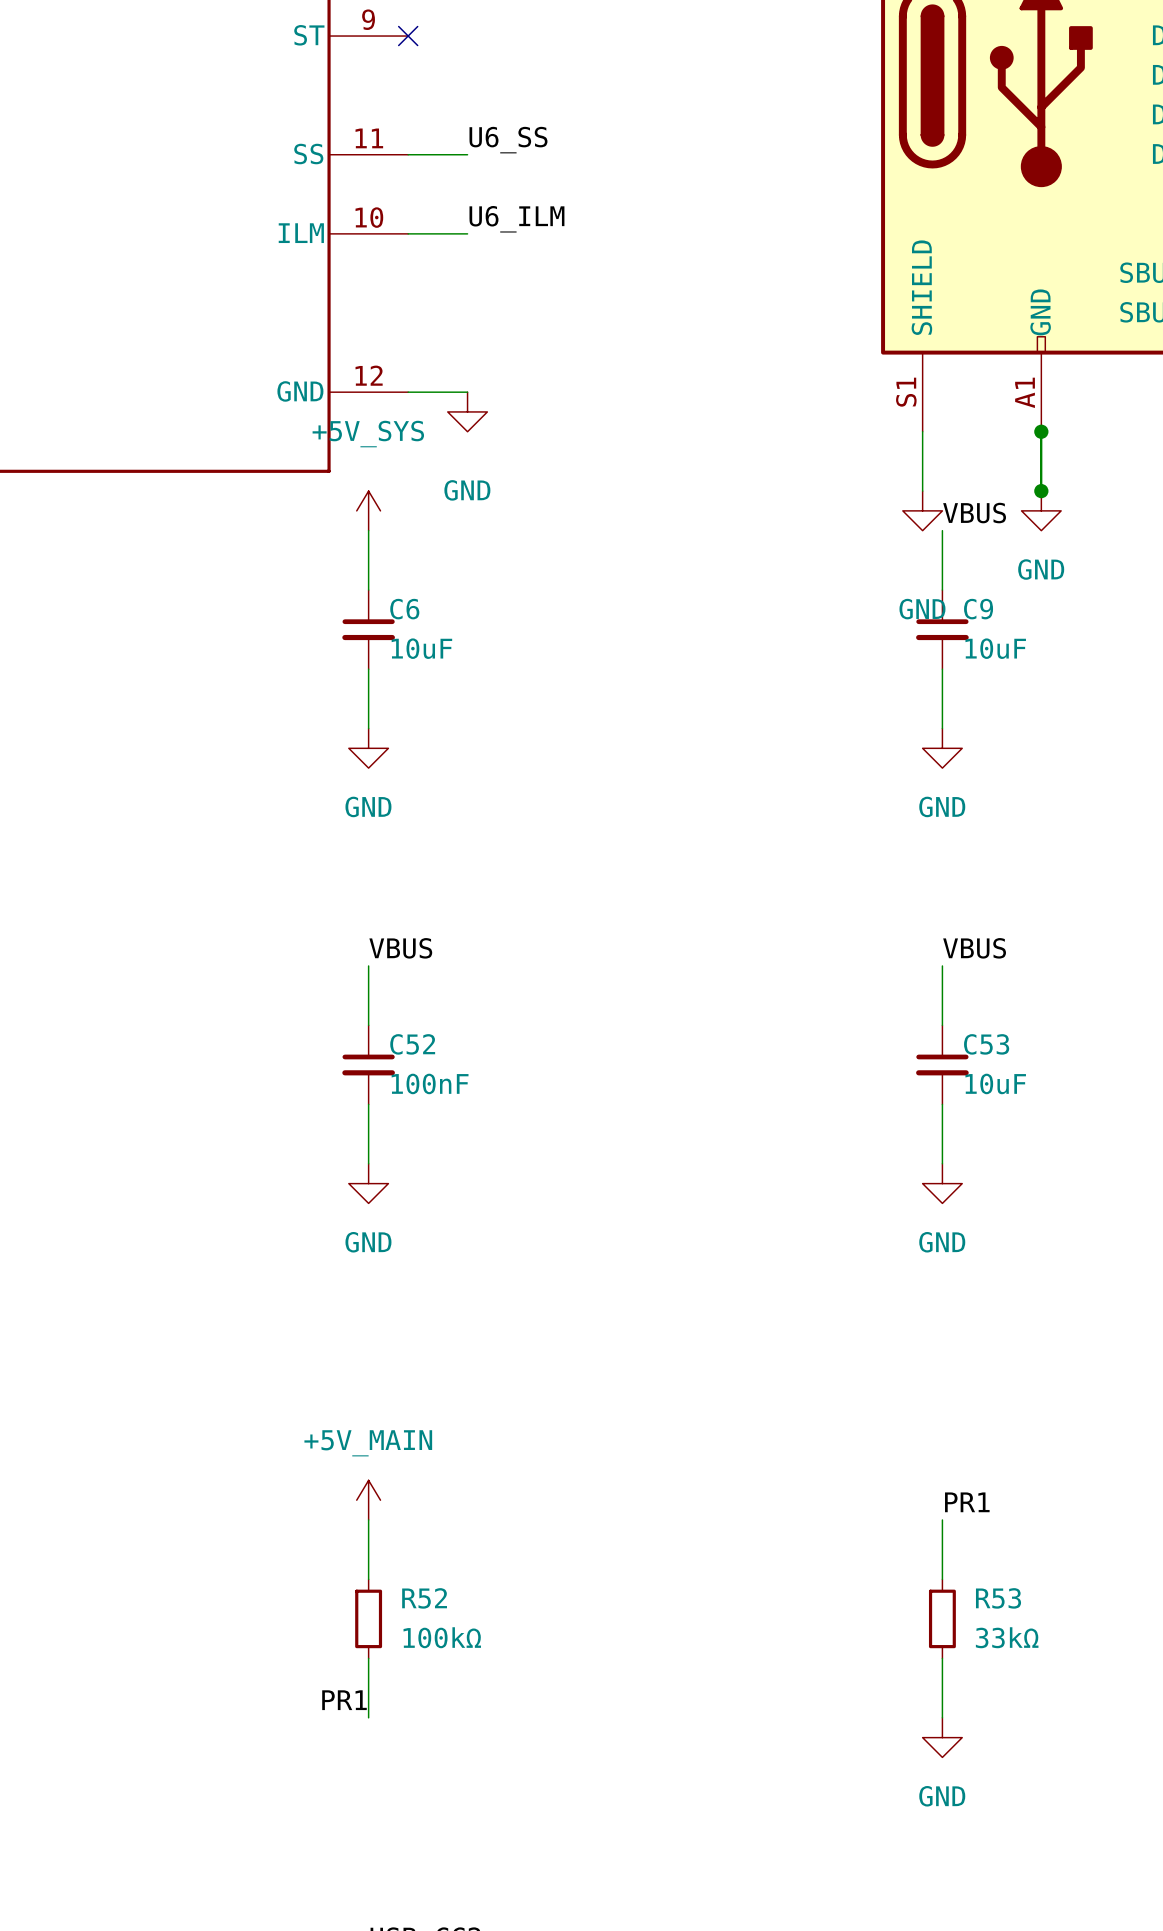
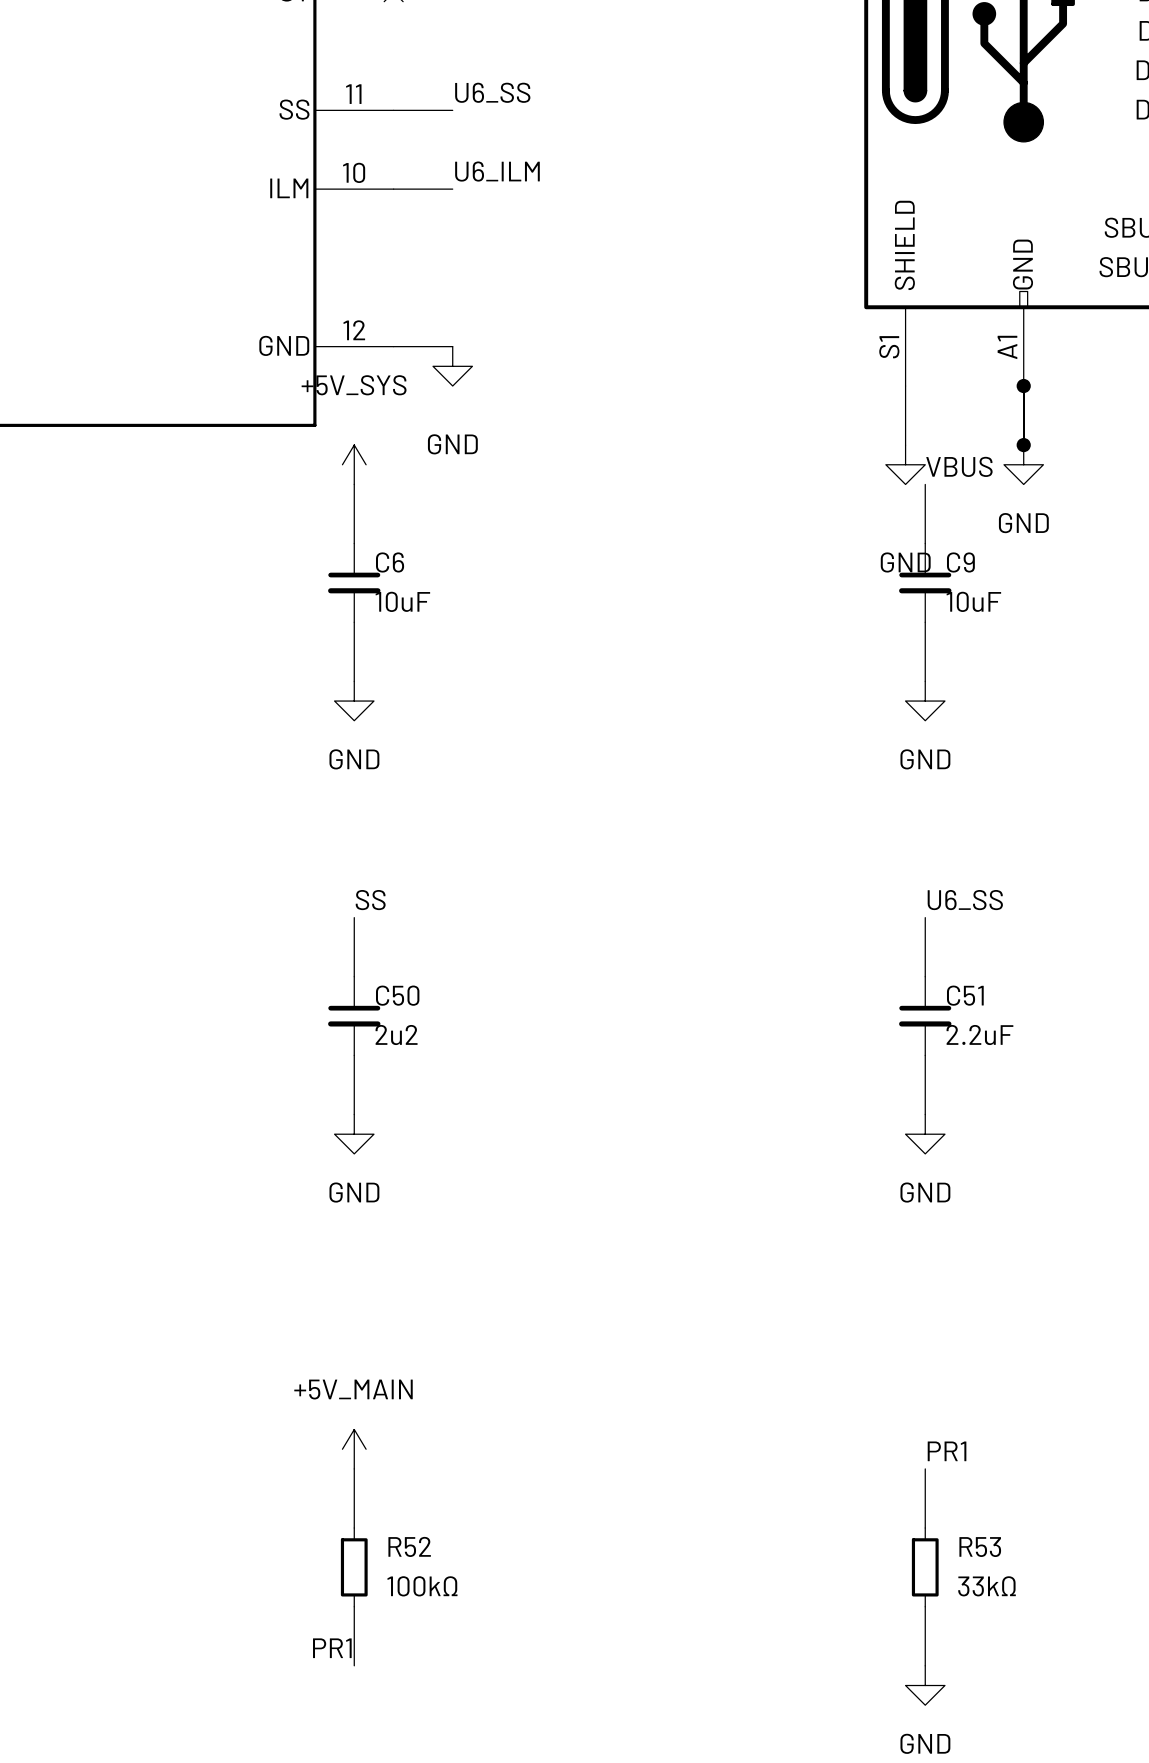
label: VBUS (400, 948) -> SS (370, 900)
label: VBUS (974, 948) -> U6_SS (965, 900)
C52 name: C52 (412, 1044) -> C50 (397, 995)
C53 name: C53 (986, 1044) -> C51 (965, 995)
C52 value: 100nF (430, 1083) -> 2u2 (396, 1035)
C53 value: 10uF (995, 1083) -> 2.2uF (979, 1035)

